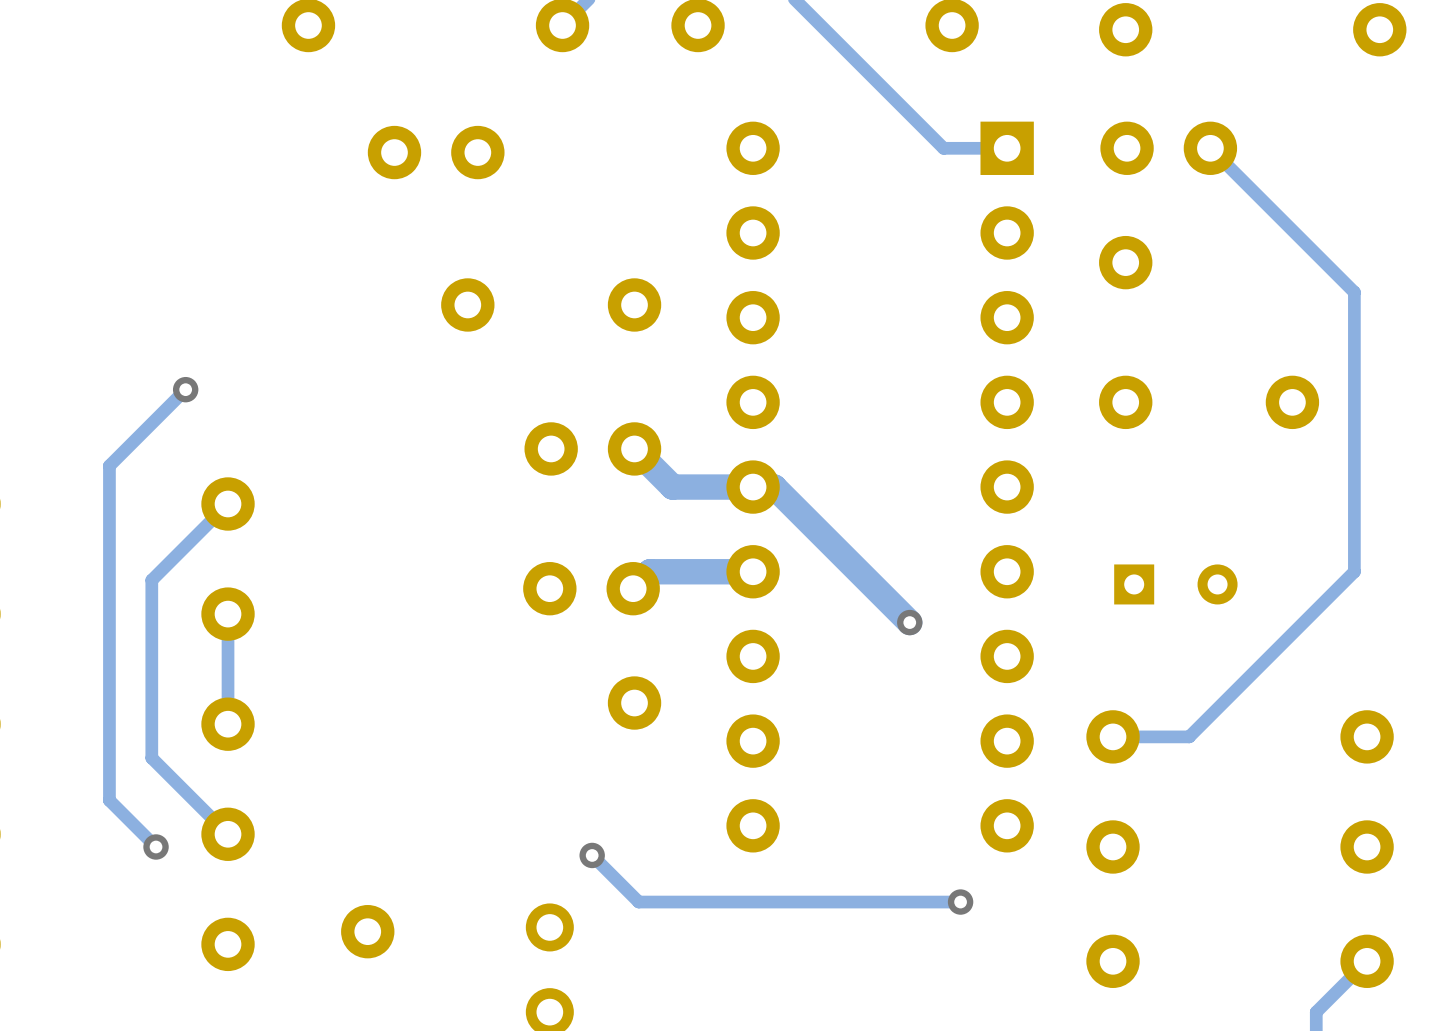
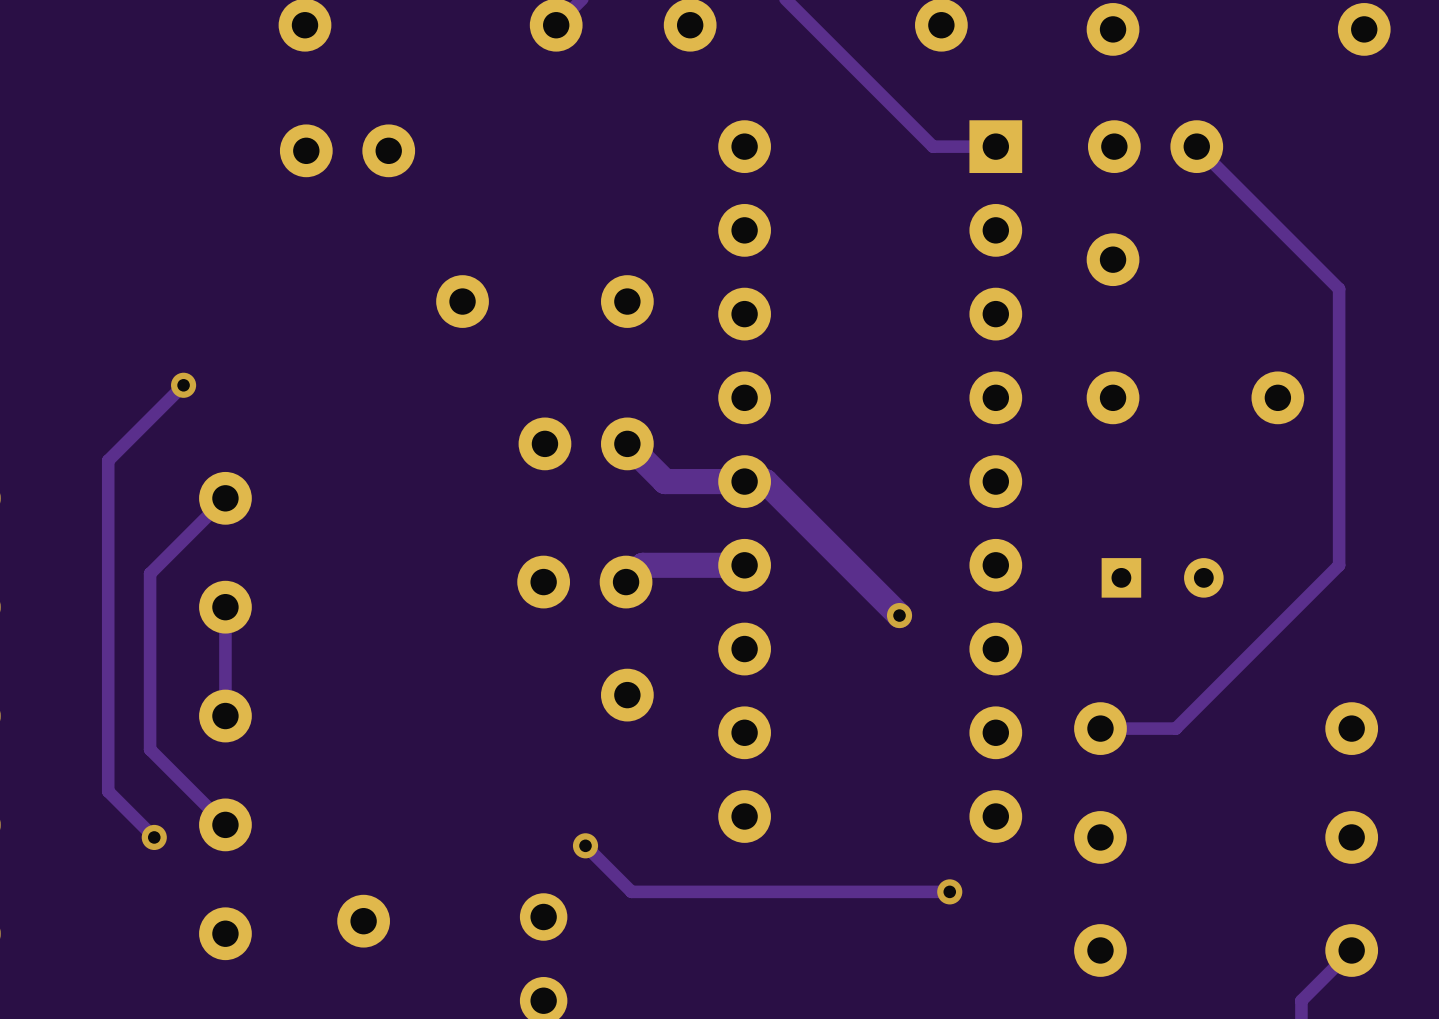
part position: (436, 152) -> (347, 150)

